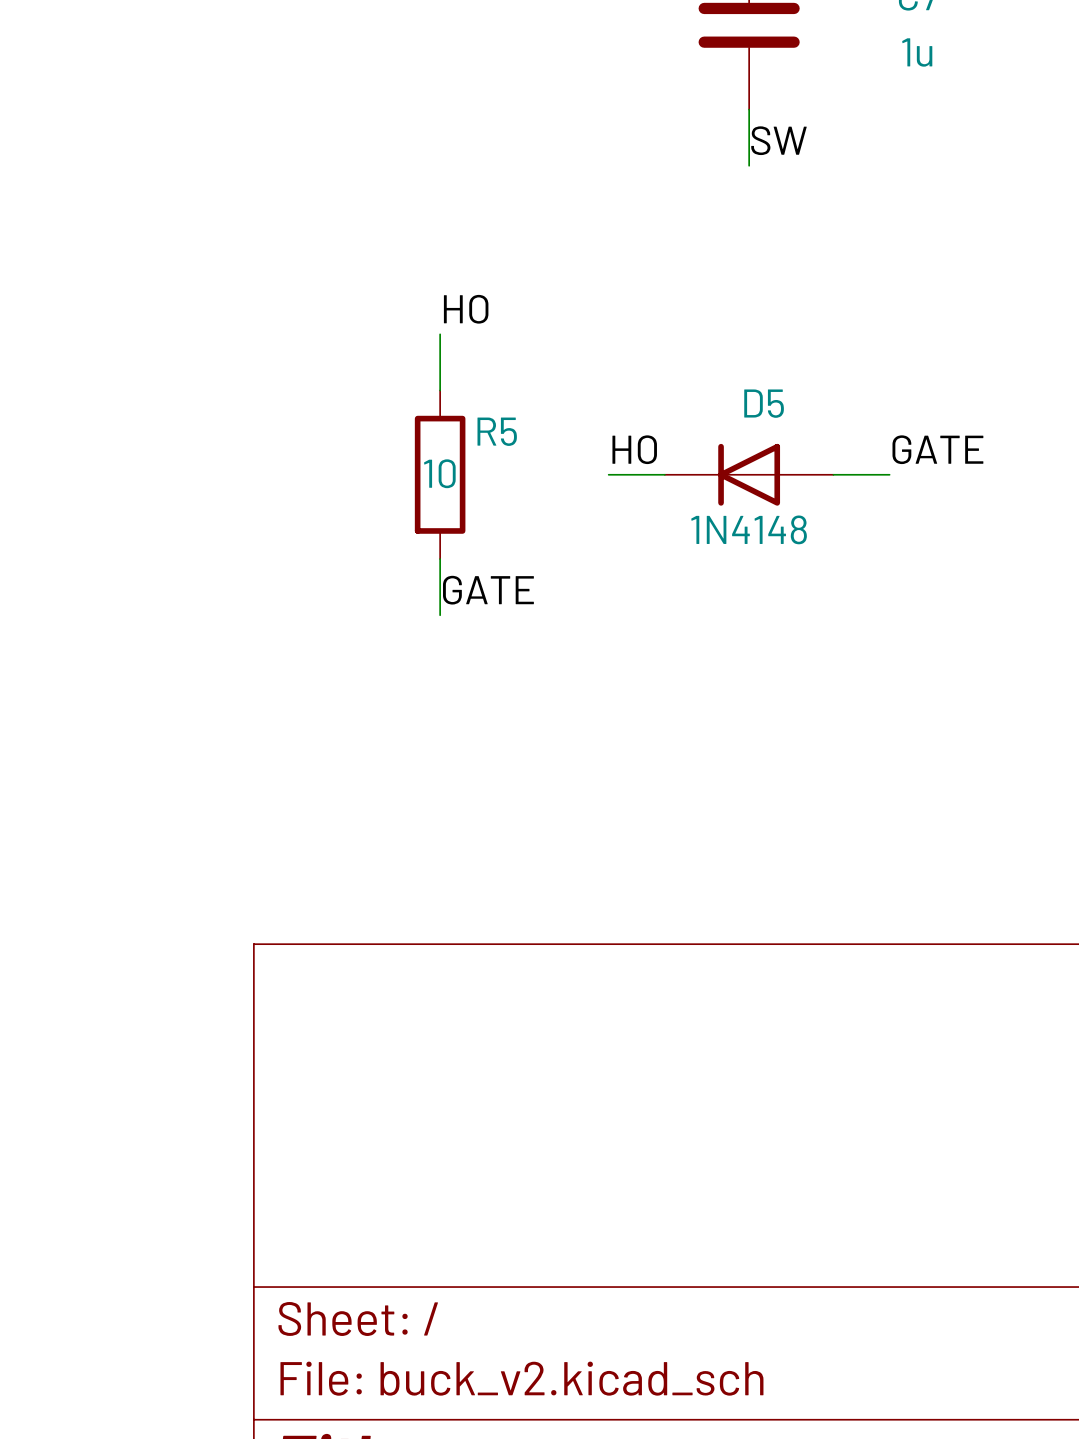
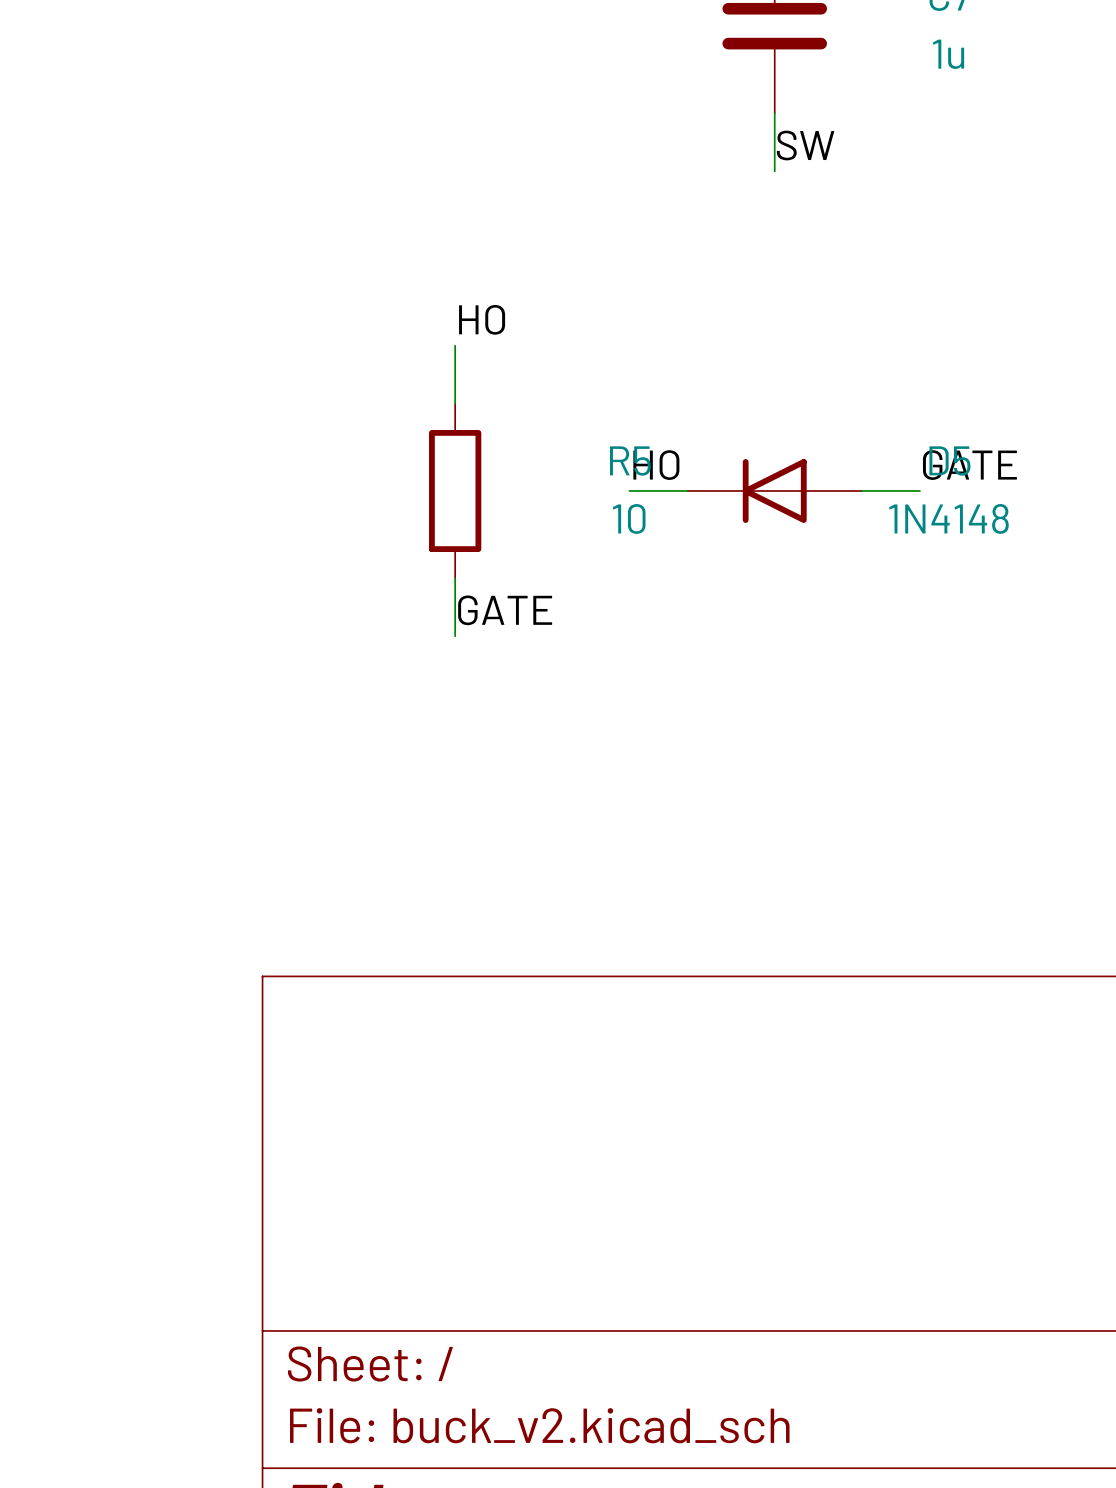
D5 name position: D5 (764, 403) -> D5 (949, 461)
R5 name position: R5 (497, 431) -> R5 (630, 461)
R5 value position: 10 (439, 473) -> 10 (629, 518)
D5 value position: 1N4148 (749, 529) -> 1N4148 (948, 518)

